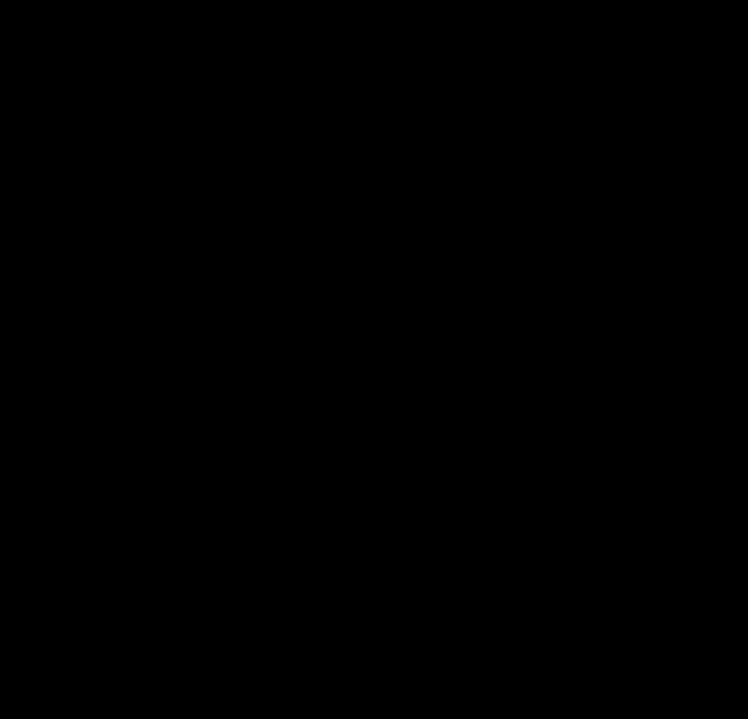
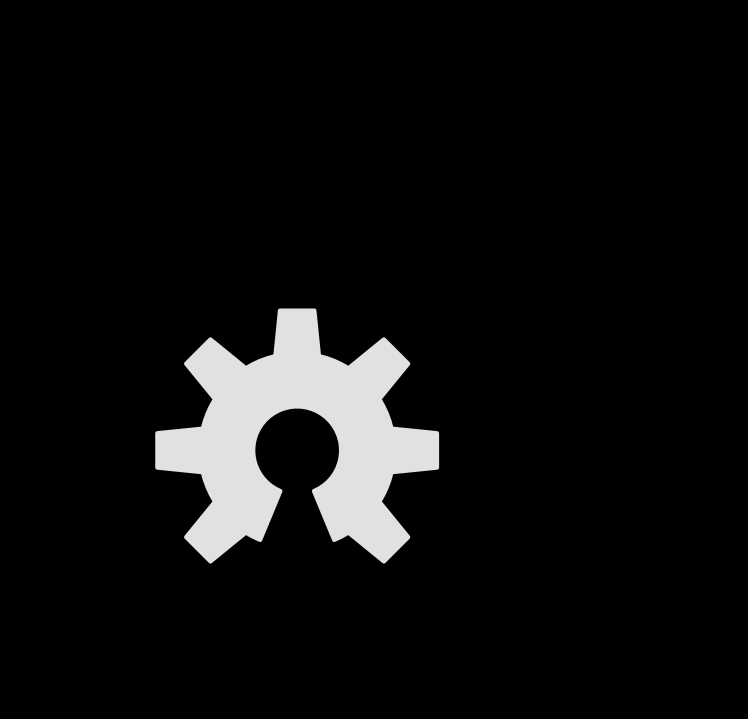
drawing: none -> [155, 308, 440, 564]

